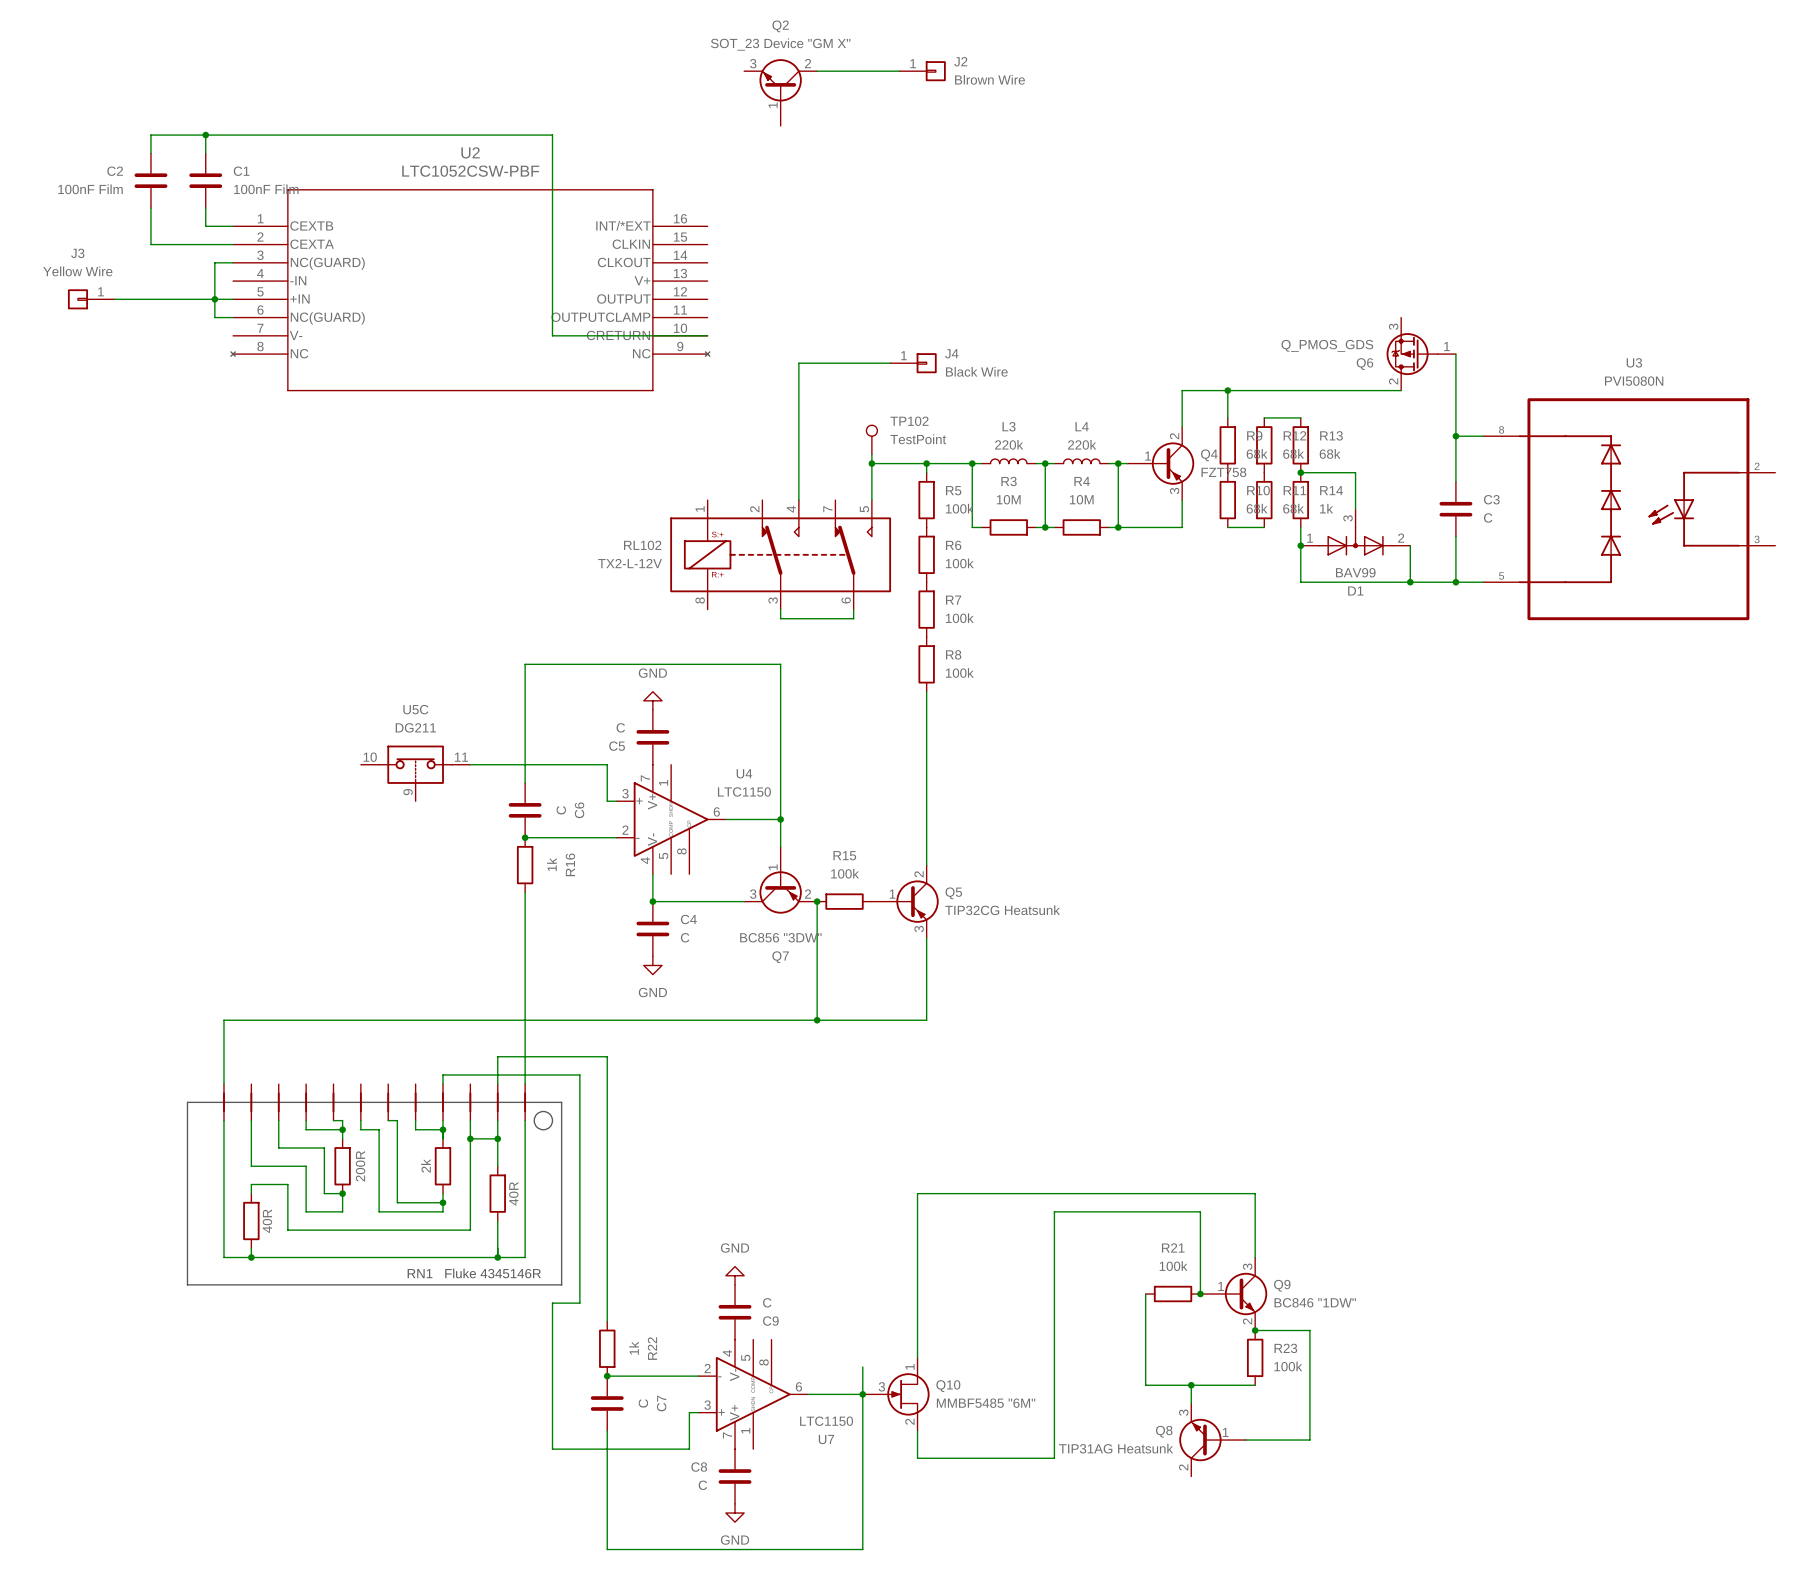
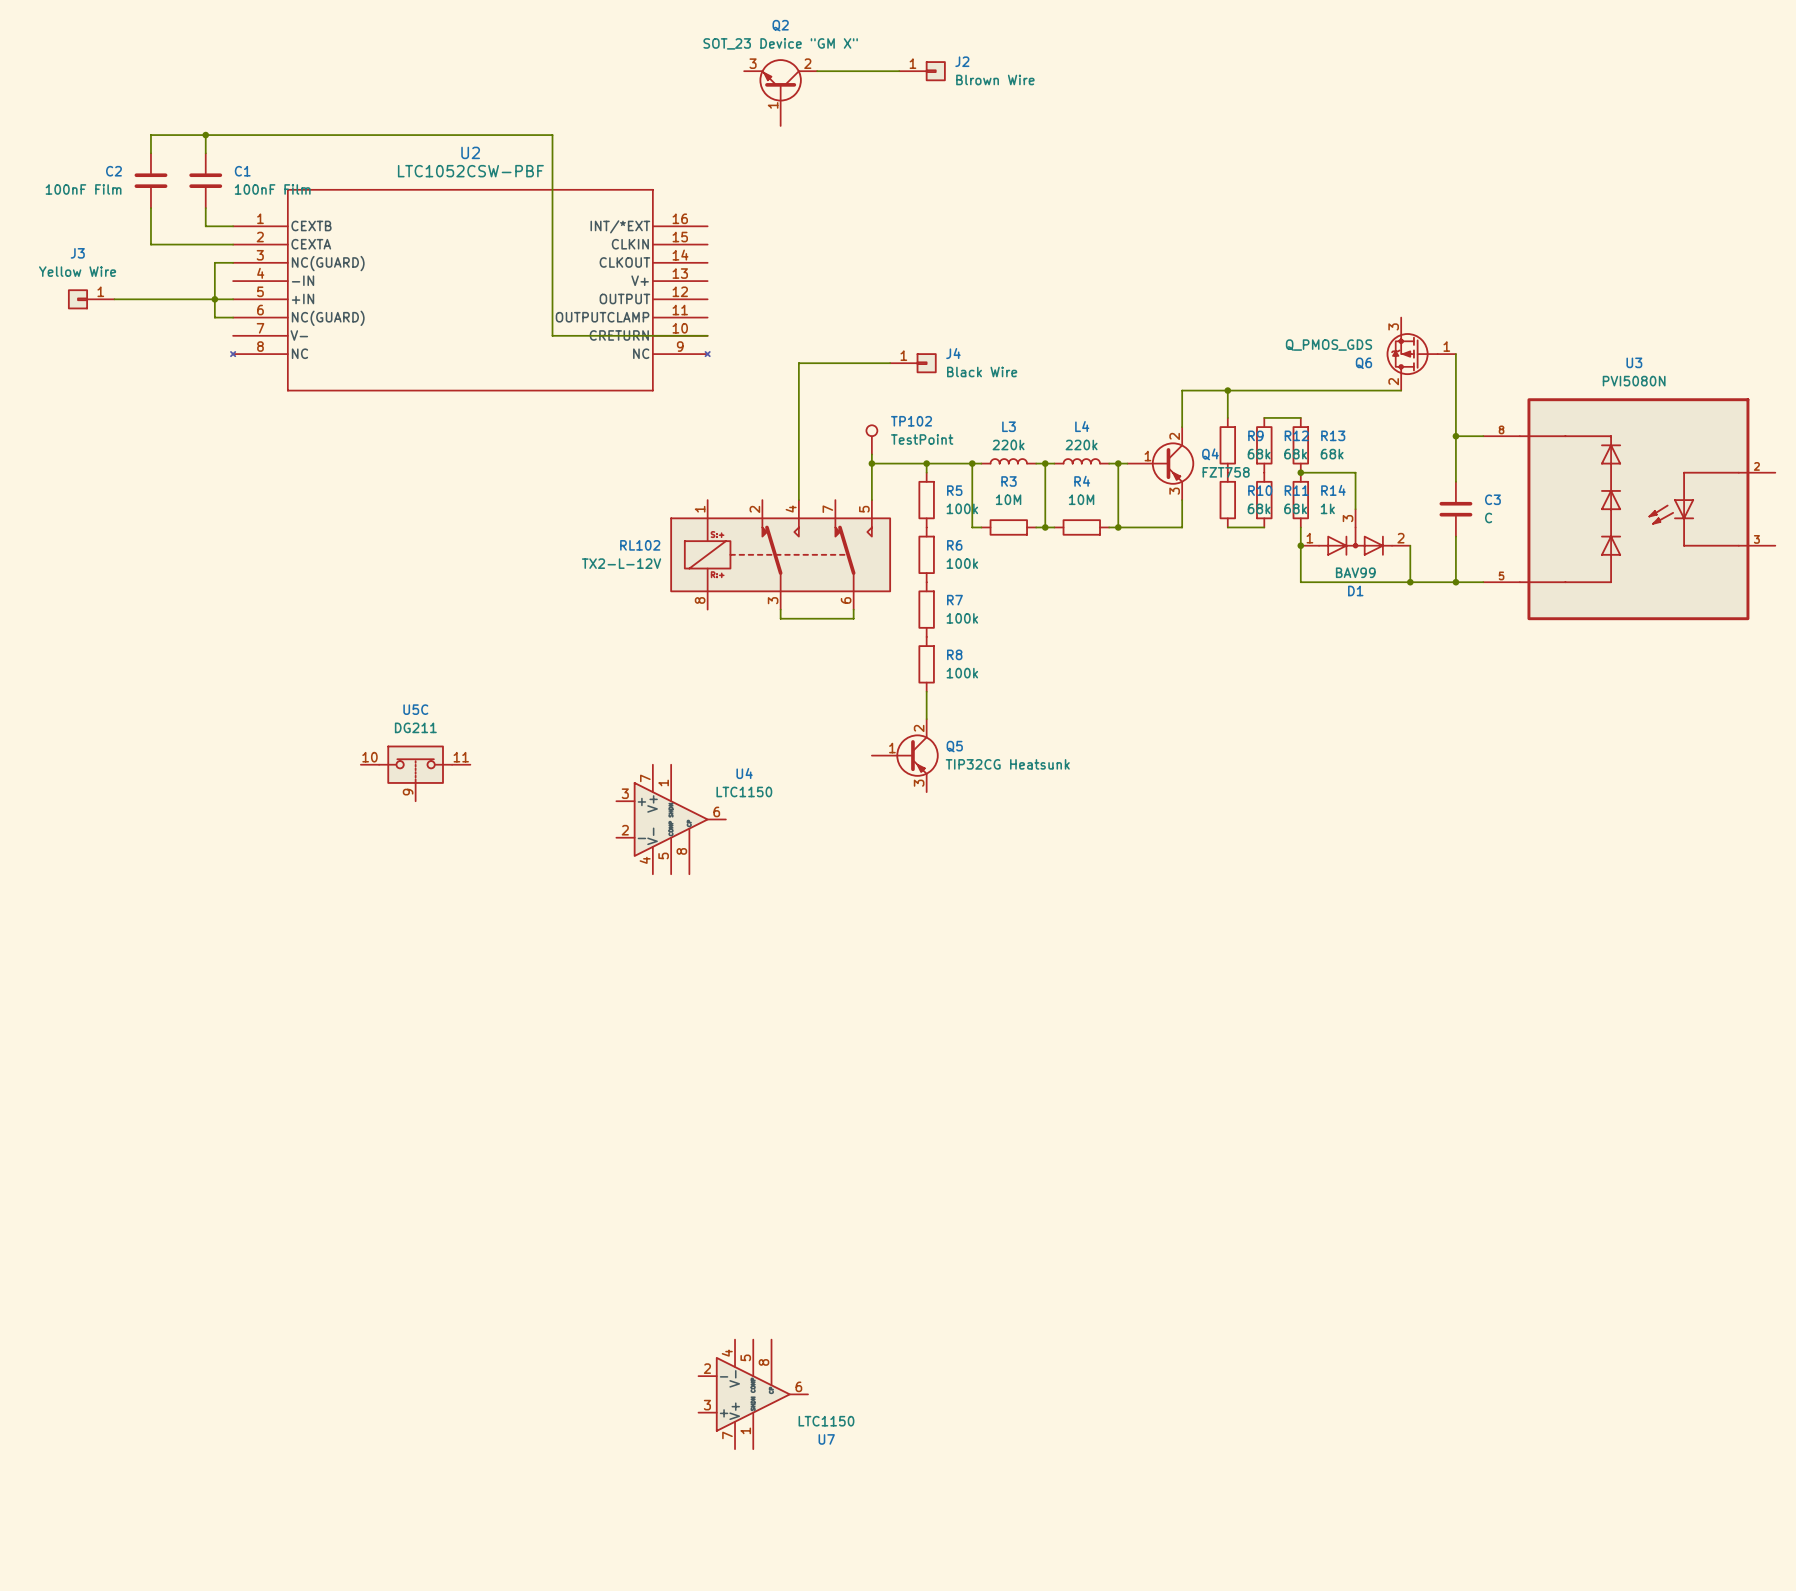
power symbol: GND (652, 700) -> none
wire: (926, 719) (926, 865) -> none
C5: C (652, 737) -> none
wire: (470, 764) (607, 764) (607, 801) (616, 801) -> none
wire: (525, 782) (525, 664) (780, 664) (780, 846) -> none
C6: C (525, 810) -> none
wire: (725, 819) (780, 819) -> none
junction: (780, 819) -> none
wire: (525, 837) (616, 837) -> none
junction: (525, 837) -> none
R16: 1k (525, 865) -> none
wire: (652, 874) (652, 901) (744, 901) -> none
Q7: BC856 "3DW" (780, 880) -> none
wire: (525, 892) (525, 1084) -> none
junction: (652, 901) -> none
wire: (817, 901) (817, 1020) -> none
junction: (817, 901) -> none
R15: 100k (844, 901) -> none
Q5 position: (905, 901) -> (905, 755)
C4: C (652, 928) -> none
wire: (926, 938) (926, 1020) (223, 1020) (223, 1084) -> none
power symbol: GND (652, 965) -> none
junction: (817, 1020) -> none
wire: (442, 1084) (442, 1074) (579, 1074) (579, 1303) (552, 1303) (552, 1449) (689, 1449) (689, 1412) (698, 1412) -> none
wire: (497, 1084) (497, 1056) (607, 1056) (607, 1321) -> none
line: (187, 1102) (561, 1102) (561, 1284) (187, 1284) (187, 1102) -> none
part: (223, 1102) -> none
part: (251, 1102) -> none
part: (278, 1102) -> none
part: (306, 1102) -> none
part: (333, 1102) -> none
part: (360, 1102) -> none
part: (388, 1102) -> none
part: (415, 1102) -> none
part: (442, 1102) -> none
part: (470, 1102) -> none
part: (497, 1102) -> none
part: (525, 1102) -> none
drawing: [534, 1111, 553, 1130] -> none
wire: (223, 1120) (223, 1257) (525, 1257) (525, 1120) -> none
wire: (251, 1120) (251, 1166) (306, 1166) (306, 1211) (342, 1211) (342, 1193) (324, 1193) (324, 1148) (278, 1148) (278, 1120) -> none
wire: (306, 1120) (306, 1129) (342, 1129) -> none
wire: (333, 1120) (342, 1120) (342, 1138) -> none
wire: (360, 1120) (360, 1129) (379, 1129) (379, 1211) (442, 1211) (442, 1193) -> none
wire: (388, 1120) (397, 1120) (397, 1202) (442, 1202) -> none
wire: (415, 1120) (415, 1129) (442, 1129) -> none
wire: (442, 1120) (442, 1138) -> none
wire: (470, 1120) (470, 1230) (287, 1230) (287, 1184) (251, 1184) (251, 1193) -> none
wire: (497, 1120) (497, 1166) -> none
junction: (342, 1129) -> none
junction: (442, 1129) -> none
wire: (470, 1138) (497, 1138) -> none
junction: (470, 1138) -> none
junction: (497, 1138) -> none
part: 200R (342, 1166) -> none
part: 2k (442, 1166) -> none
junction: (342, 1193) -> none
part: 40R (497, 1193) -> none
junction: (442, 1202) -> none
part: 40R (251, 1221) -> none
wire: (497, 1221) (497, 1257) -> none
wire: (251, 1248) (251, 1257) -> none
junction: (251, 1257) -> none
junction: (497, 1257) -> none
wire: (1255, 1257) (1255, 1193) (917, 1193) (917, 1357) -> none
text: RN1 Fluke 4345146R (474, 1273) -> none
power symbol: GND (735, 1275) -> none
wire: (1145, 1294) (1145, 1385) (1255, 1385) -> none
R21: 100k (1173, 1294) -> none
wire: (1200, 1294) (1200, 1211) (1054, 1211) (1054, 1458) (917, 1458) (917, 1430) -> none
junction: (1200, 1294) -> none
Q9: BC846 "1DW" (1233, 1294) -> none
C9: C (735, 1312) -> none
wire: (1255, 1330) (1309, 1330) (1309, 1440) (1246, 1440) -> none
junction: (1255, 1330) -> none
R22: 1k (607, 1348) -> none
R23: 100k (1255, 1357) -> none
wire: (862, 1367) (862, 1549) (607, 1549) (607, 1430) -> none
wire: (607, 1376) (698, 1376) -> none
junction: (607, 1376) -> none
wire: (1191, 1385) (1191, 1403) -> none
junction: (1191, 1385) -> none
wire: (808, 1394) (862, 1394) -> none
junction: (862, 1394) -> none
Q10: MMBF5485 "6M" (896, 1394) -> none
C7: C (607, 1403) -> none
Q8: TIP31AG Heatsunk (1212, 1440) -> none
C8: C (735, 1476) -> none
power symbol: GND (735, 1513) -> none

